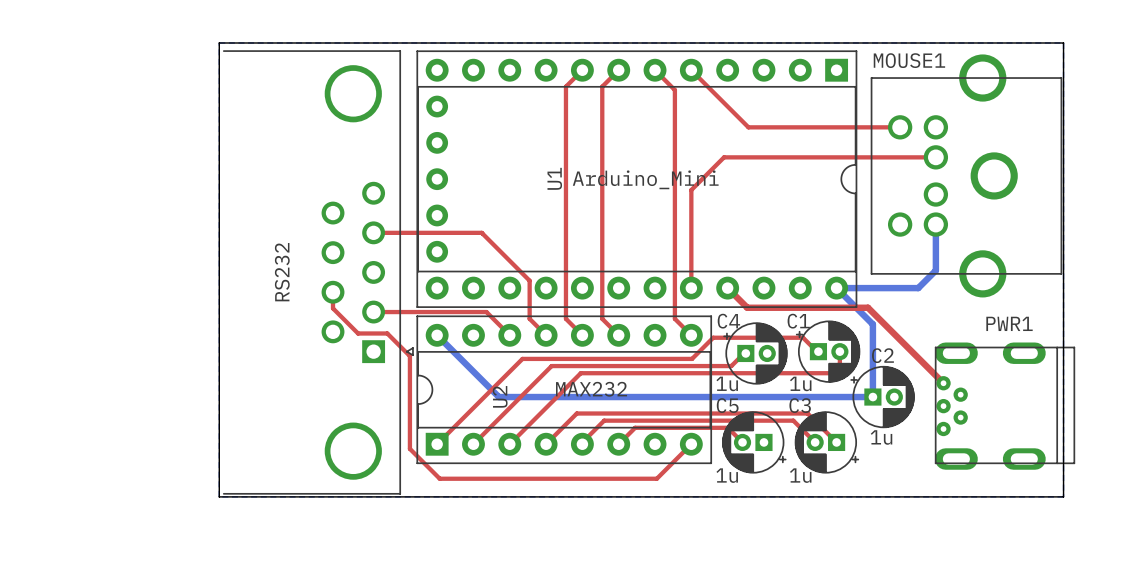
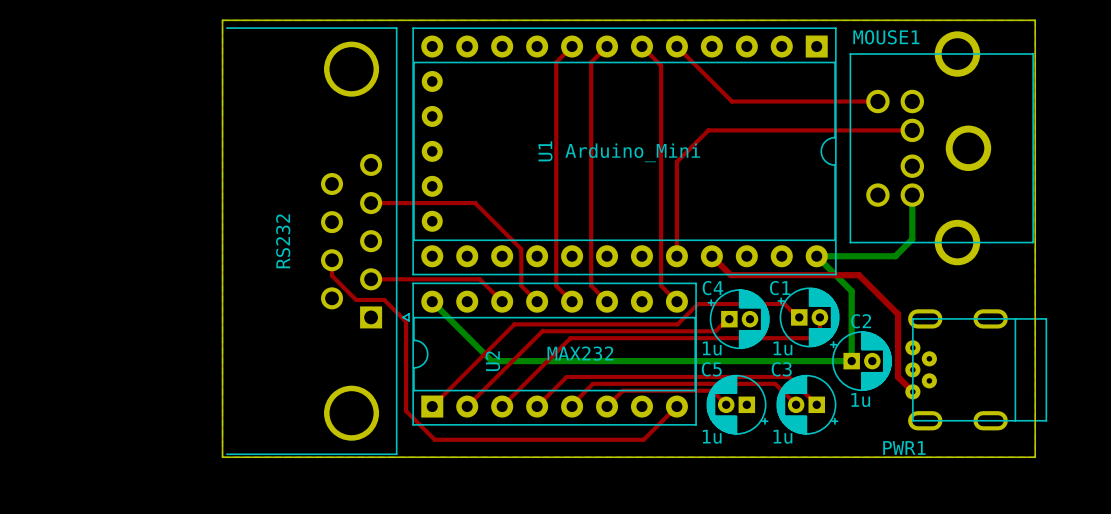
top track: (868, 307) (943, 383) -> (847, 275) (858, 275) (898, 314) (898, 377) (912, 391)
PWR1 name position: PWR1 (1009, 323) -> PWR1 (904, 447)
PWR1 footprint: [934, 342, 1076, 470] -> [905, 309, 1048, 431]

